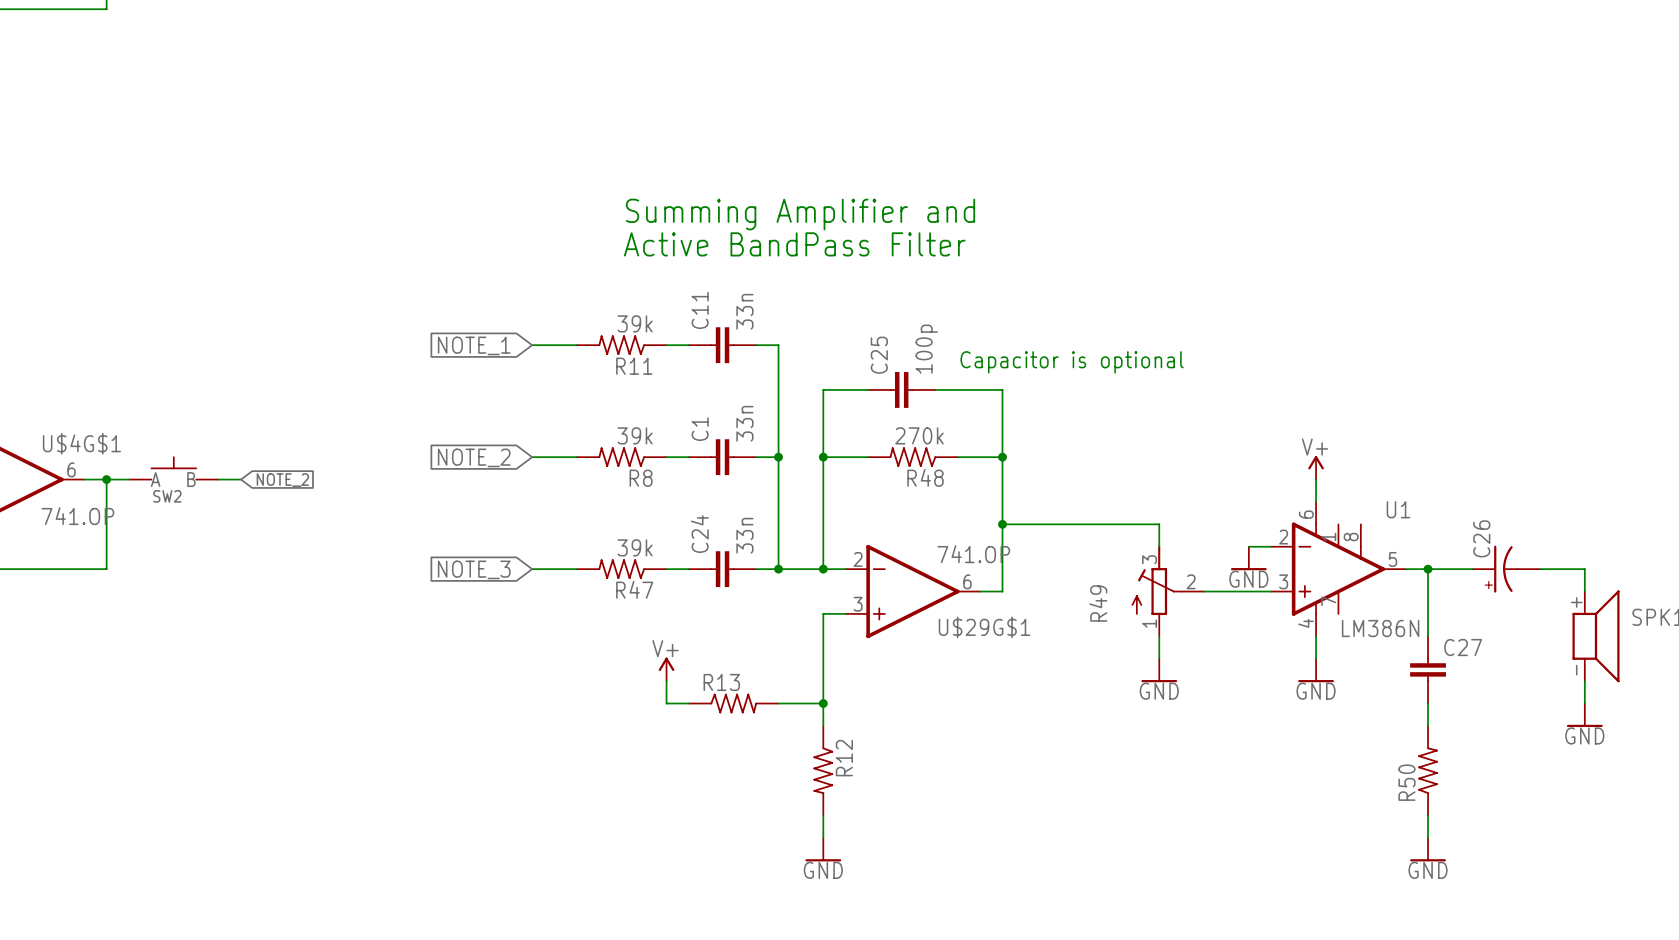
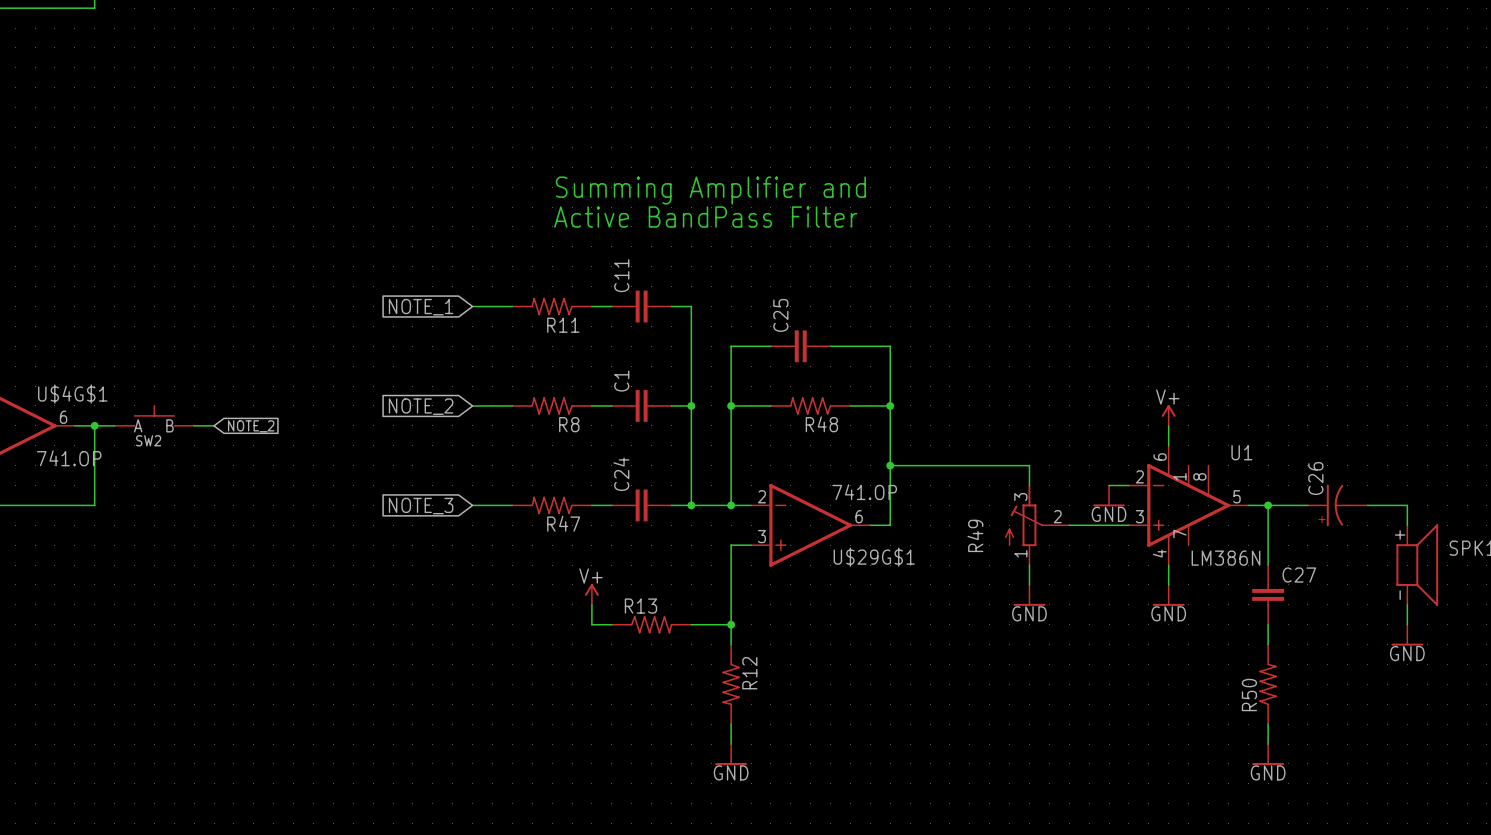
C11 value: 33n (744, 311) -> none
R11 value: 39k (635, 323) -> none
C25 value: 100p (926, 349) -> none
text: Capacitor is optional (1072, 362) -> none
C1 value: 33n (744, 423) -> none
R8 value: 39k (635, 435) -> none
R48 value: 270k (919, 435) -> none
C24 value: 33n (744, 535) -> none
R47 value: 39k (635, 547) -> none

